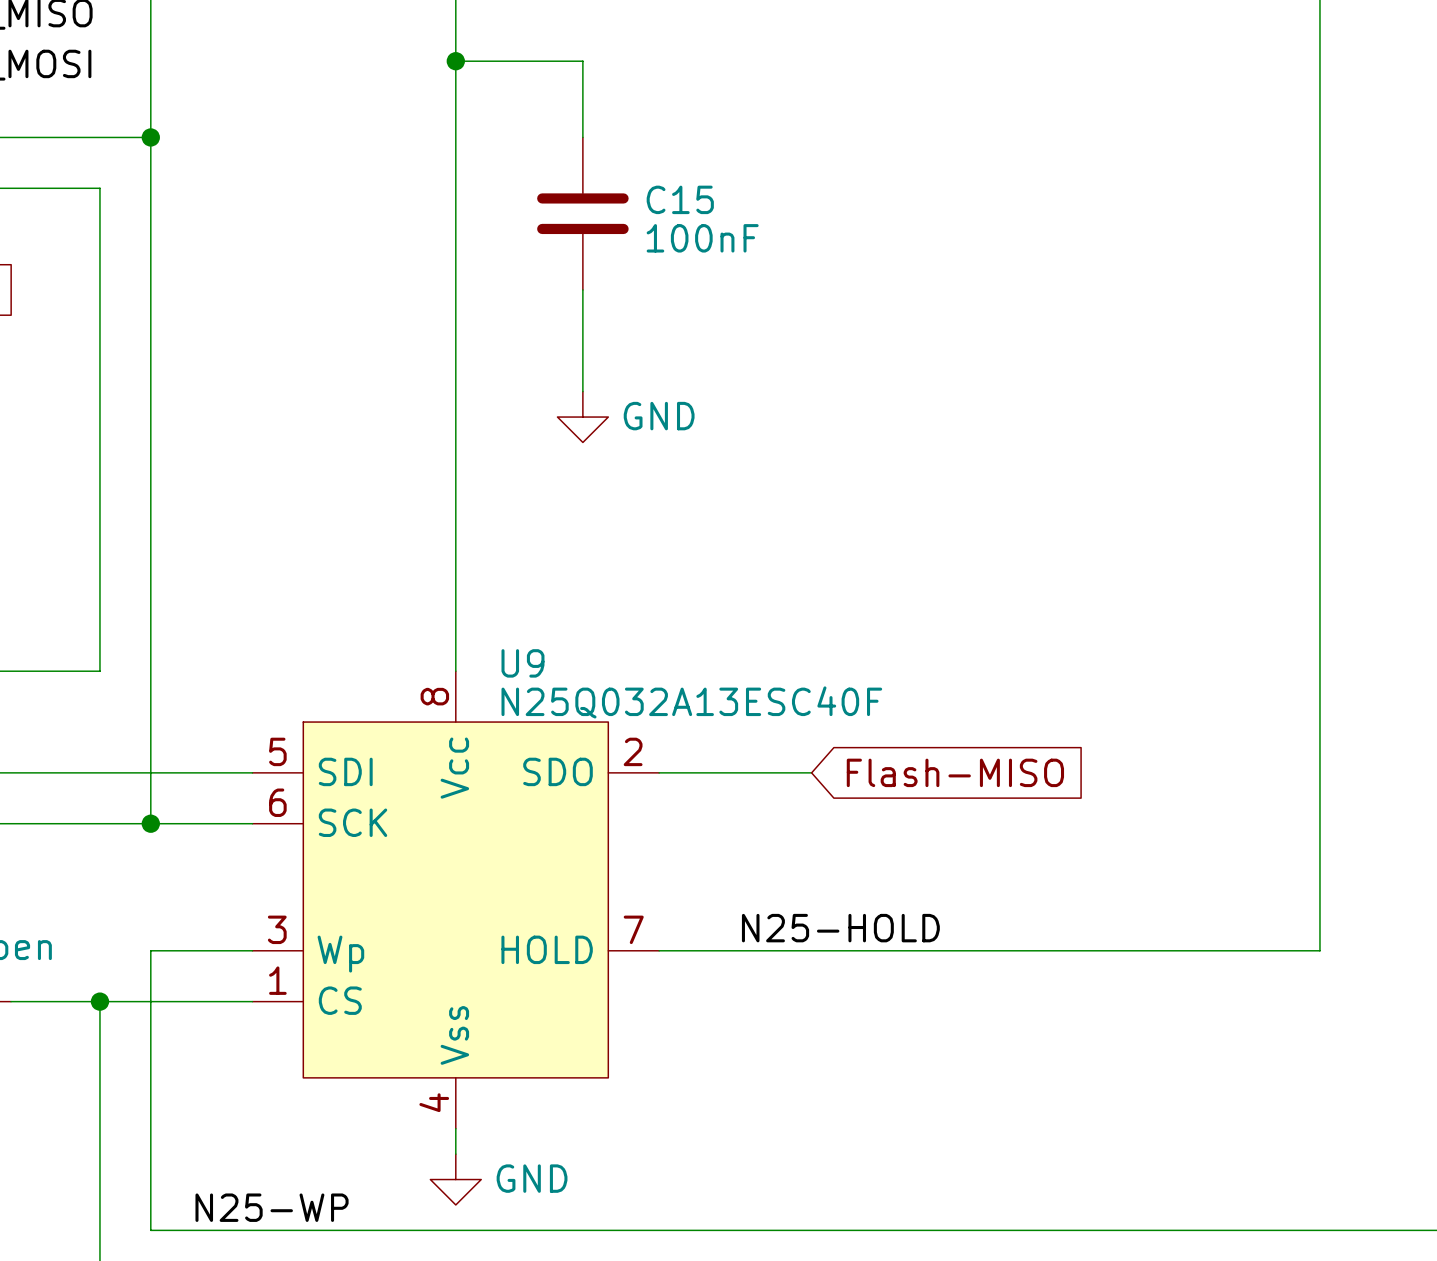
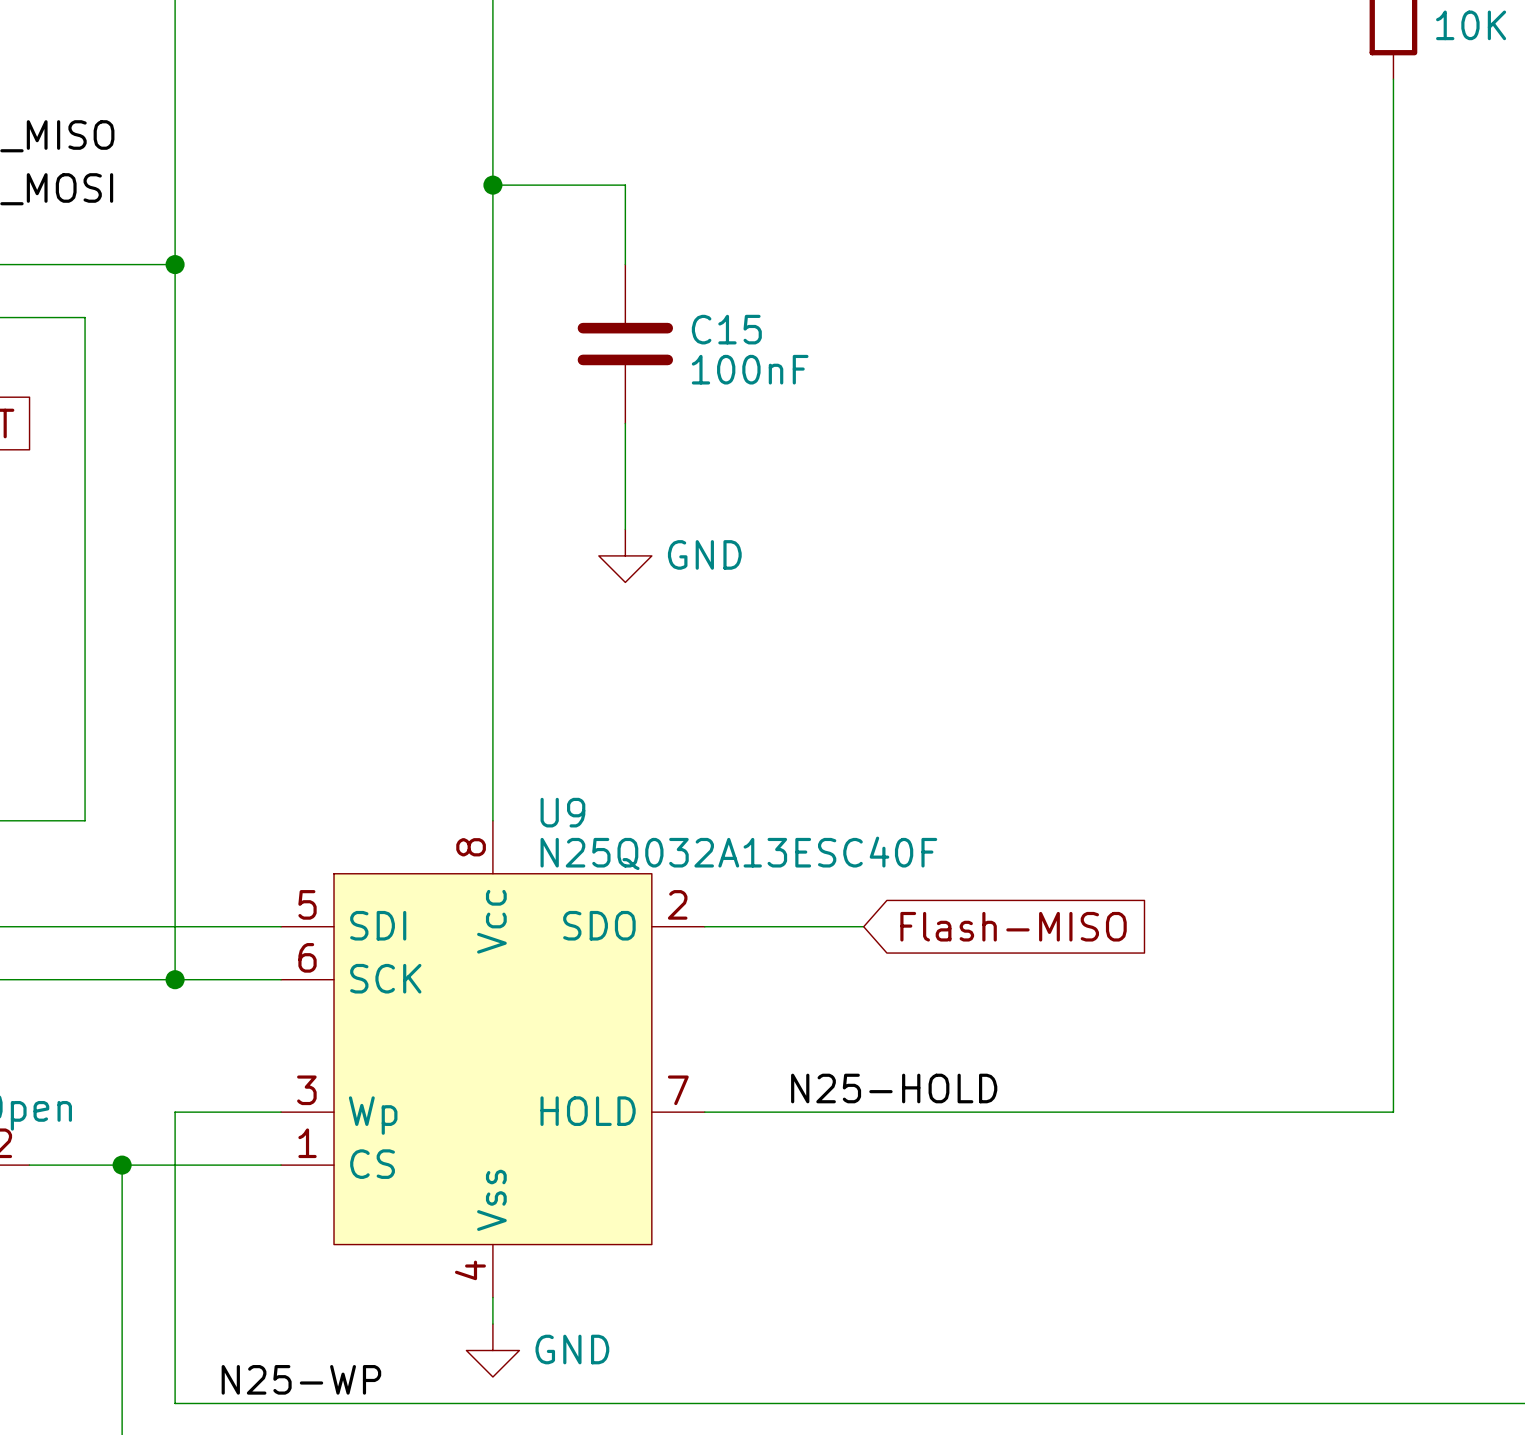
wire: (64, 188) (99, 188) (99, 671) (64, 671) -> (85, 317) (85, 820)

